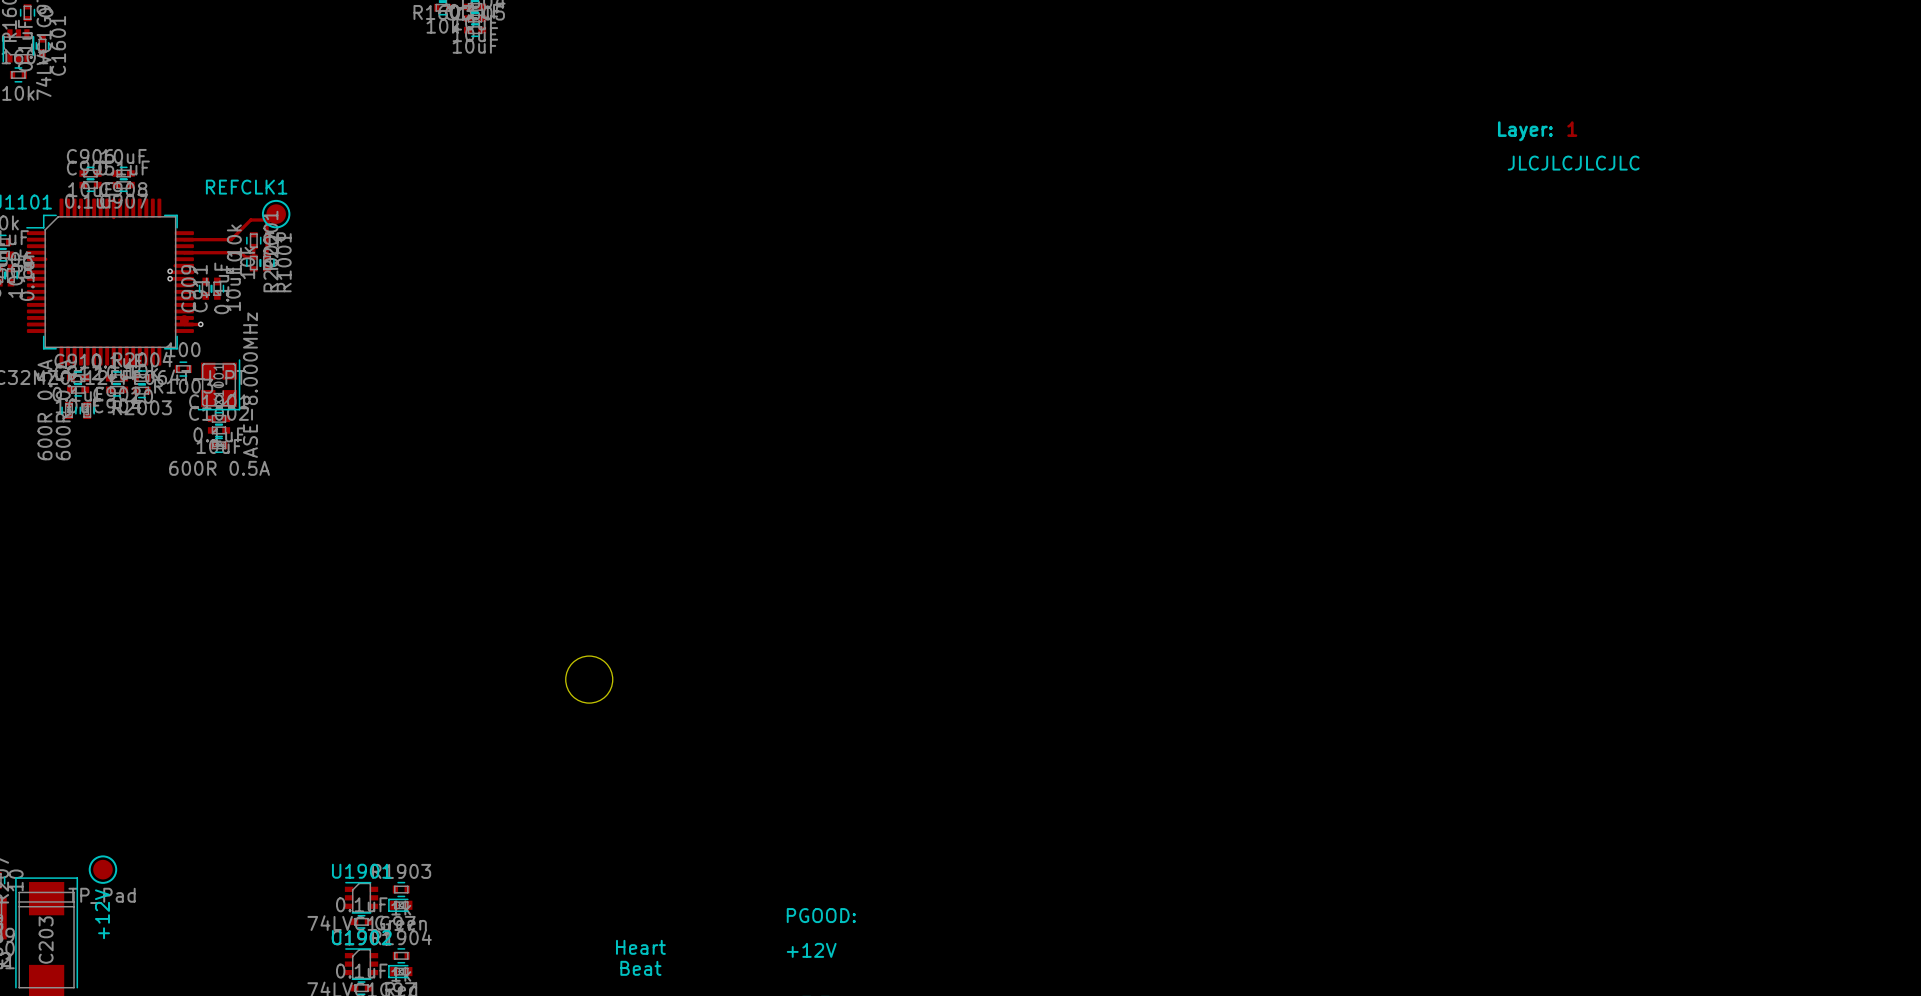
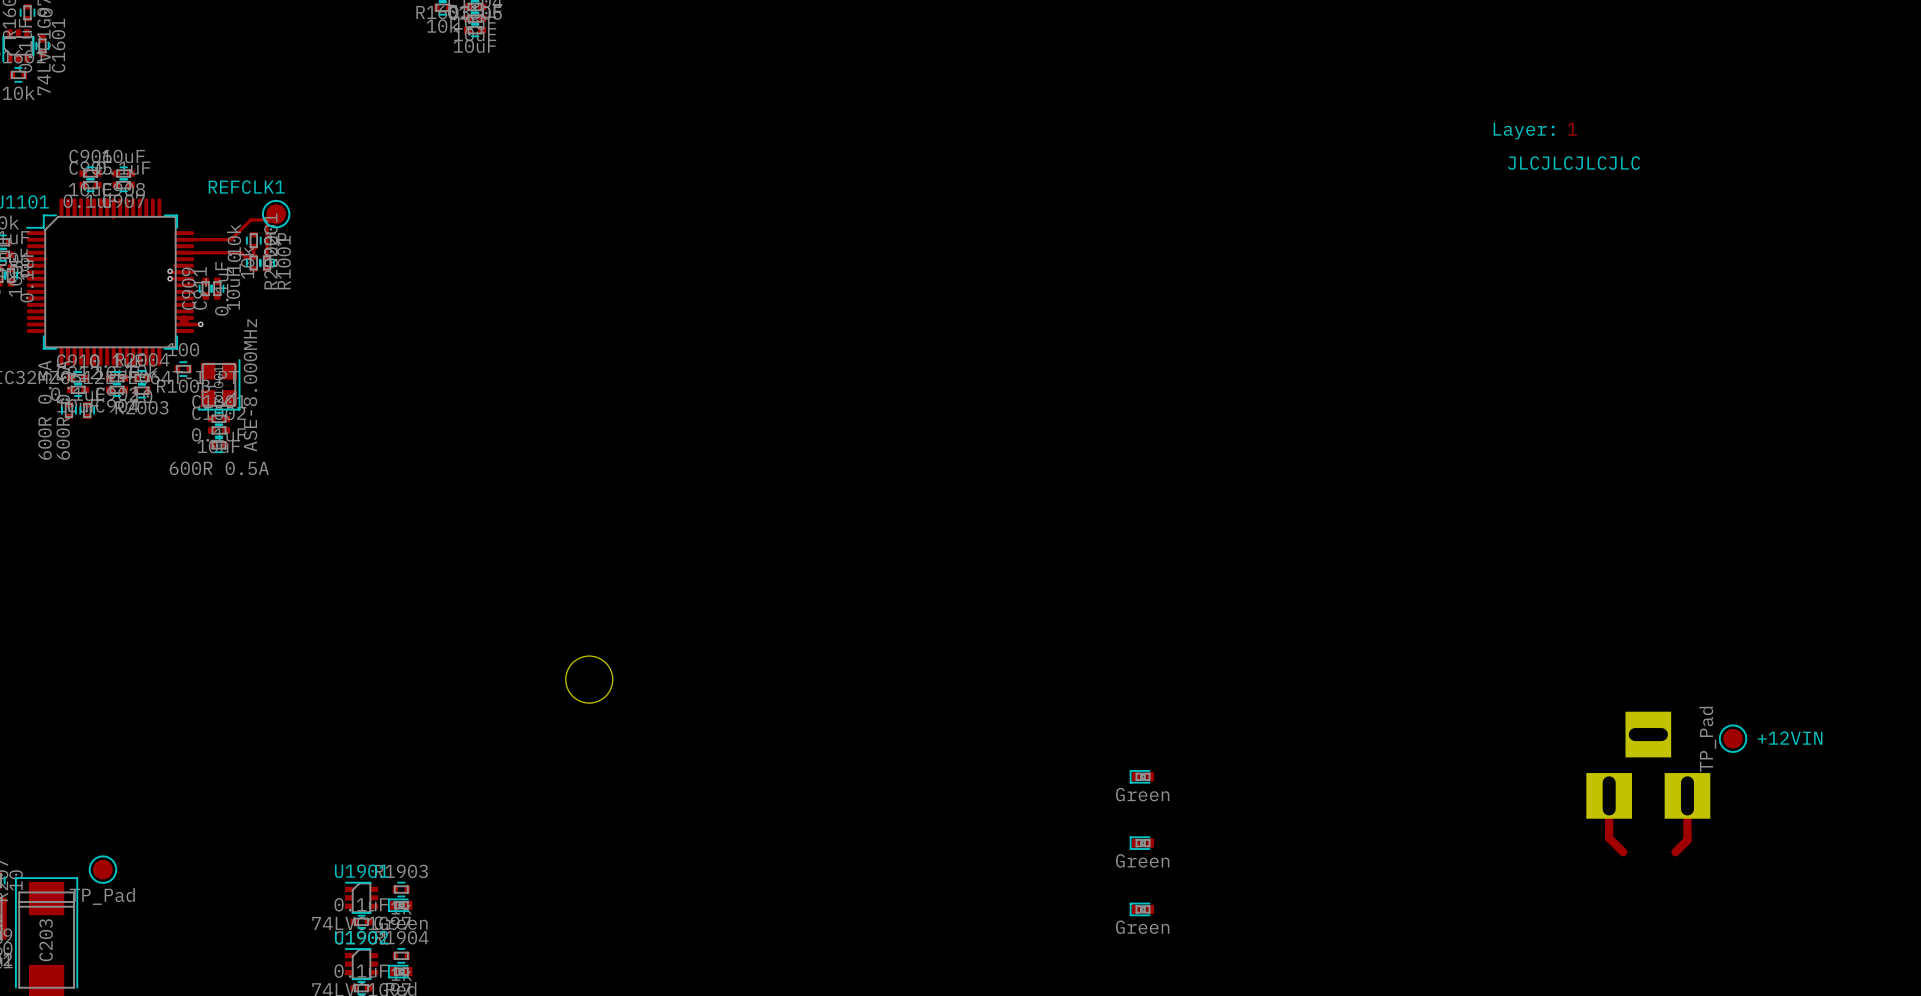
part: none -> TP_Pad (1733, 738)
text: none -> +12VIN (1790, 738)
part: none -> (1648, 765)
part: none -> Green (1141, 776)
track: none -> (1609, 795) (1609, 838) (1623, 852)
track: none -> (1687, 795) (1687, 840) (1675, 852)
part: none -> Green (1141, 843)
part: none -> Green (1141, 909)
text: +12V (102, 914) -> none
text: PGOOD: (821, 915) -> none
text: Heart (640, 947) -> none
text: +12V (811, 950) -> none
text: Beat (640, 968) -> none

